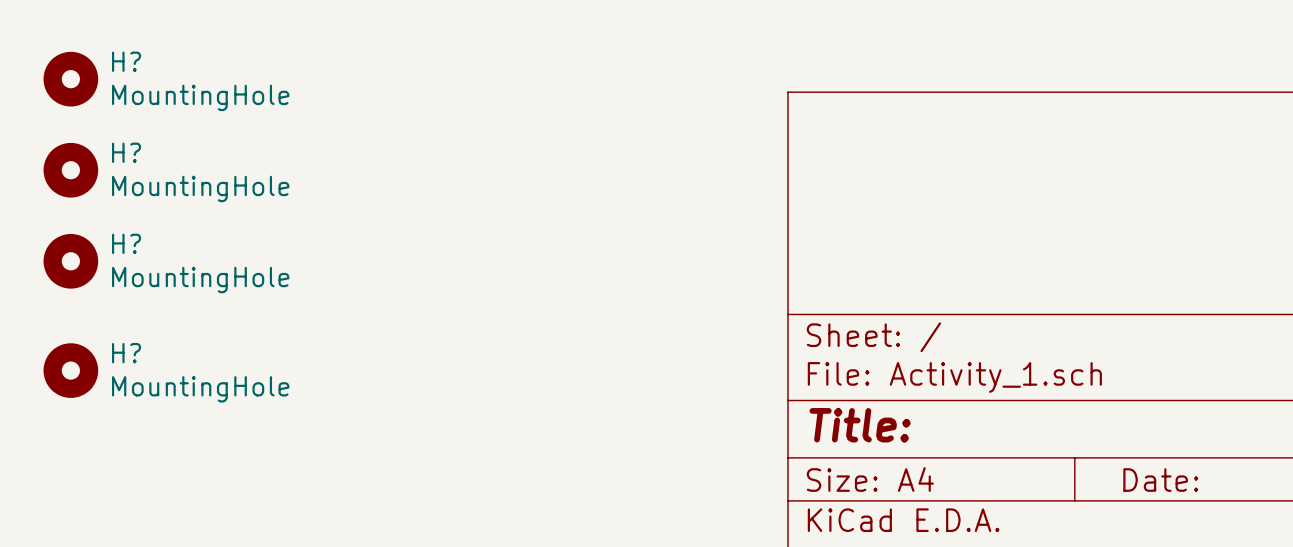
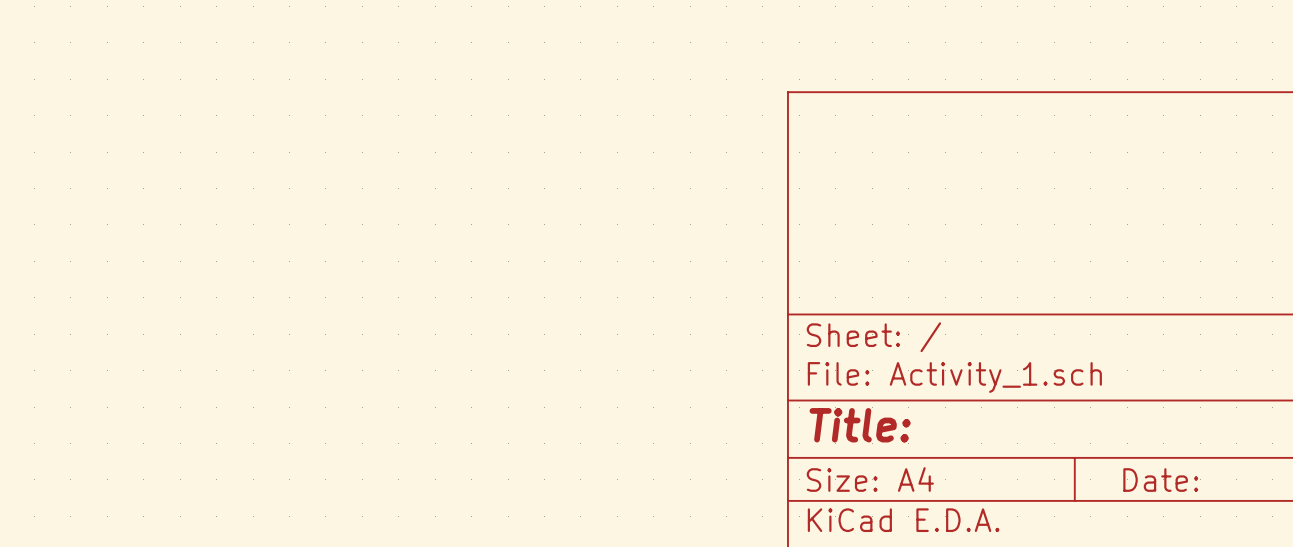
H?: MountingHole (70, 79) -> none
H?: MountingHole (70, 170) -> none
H?: MountingHole (70, 261) -> none
H?: MountingHole (70, 370) -> none

